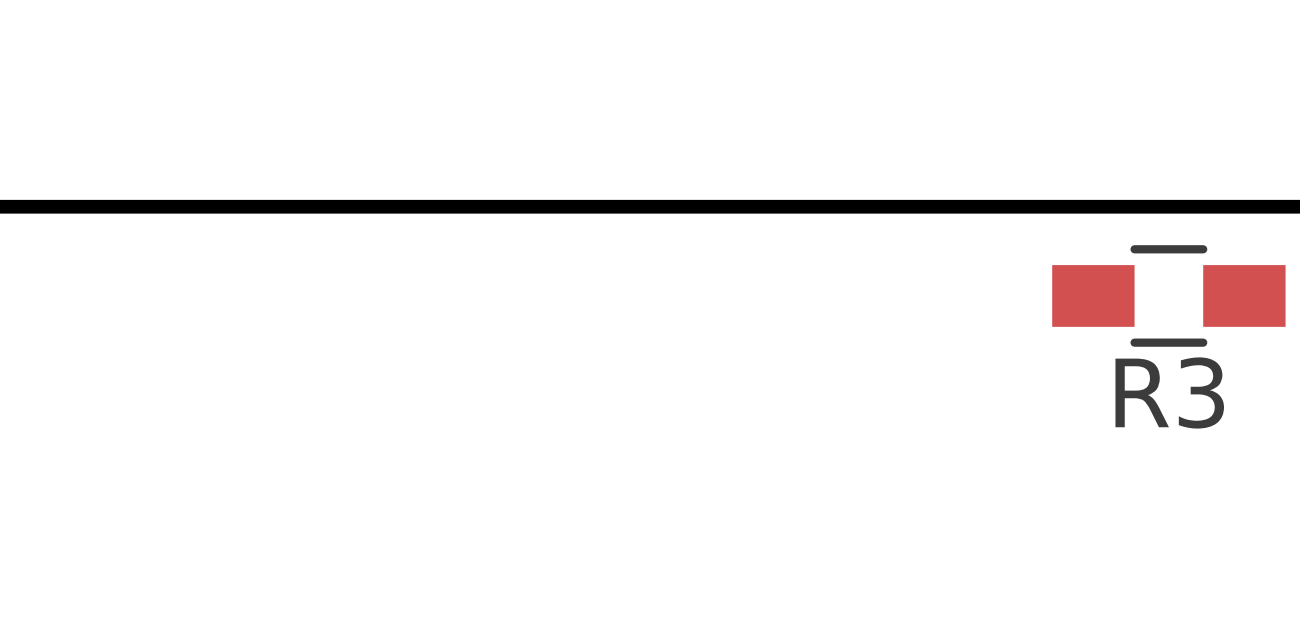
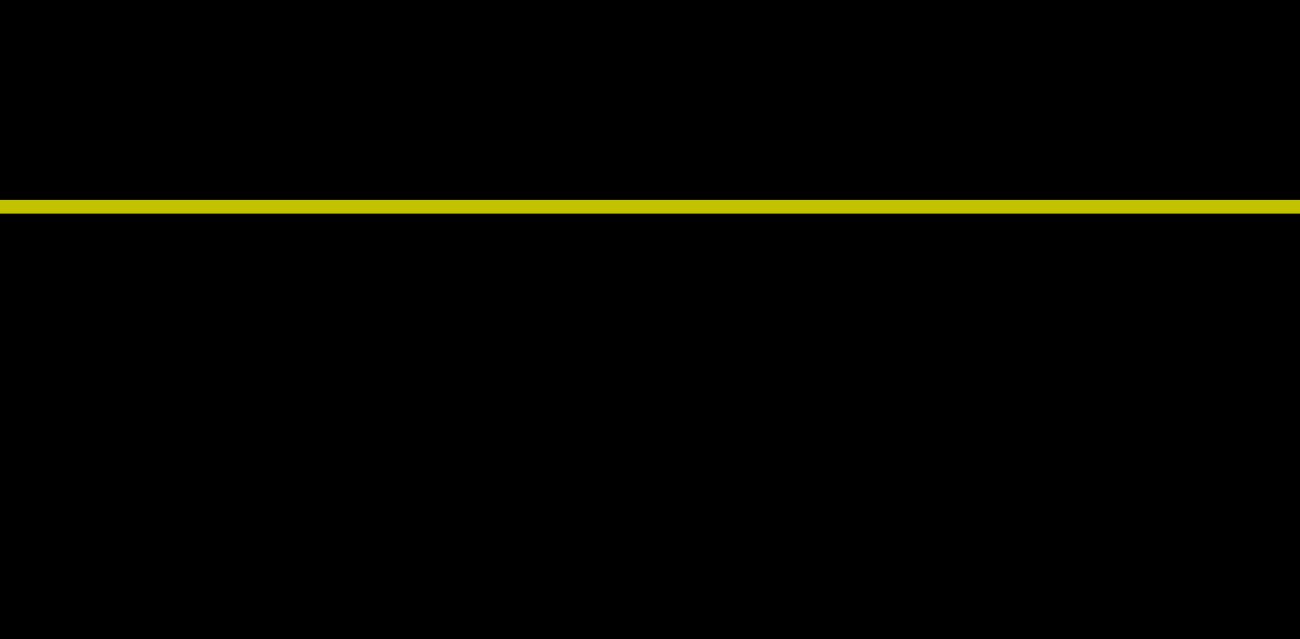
R3: (1168, 295) -> none

